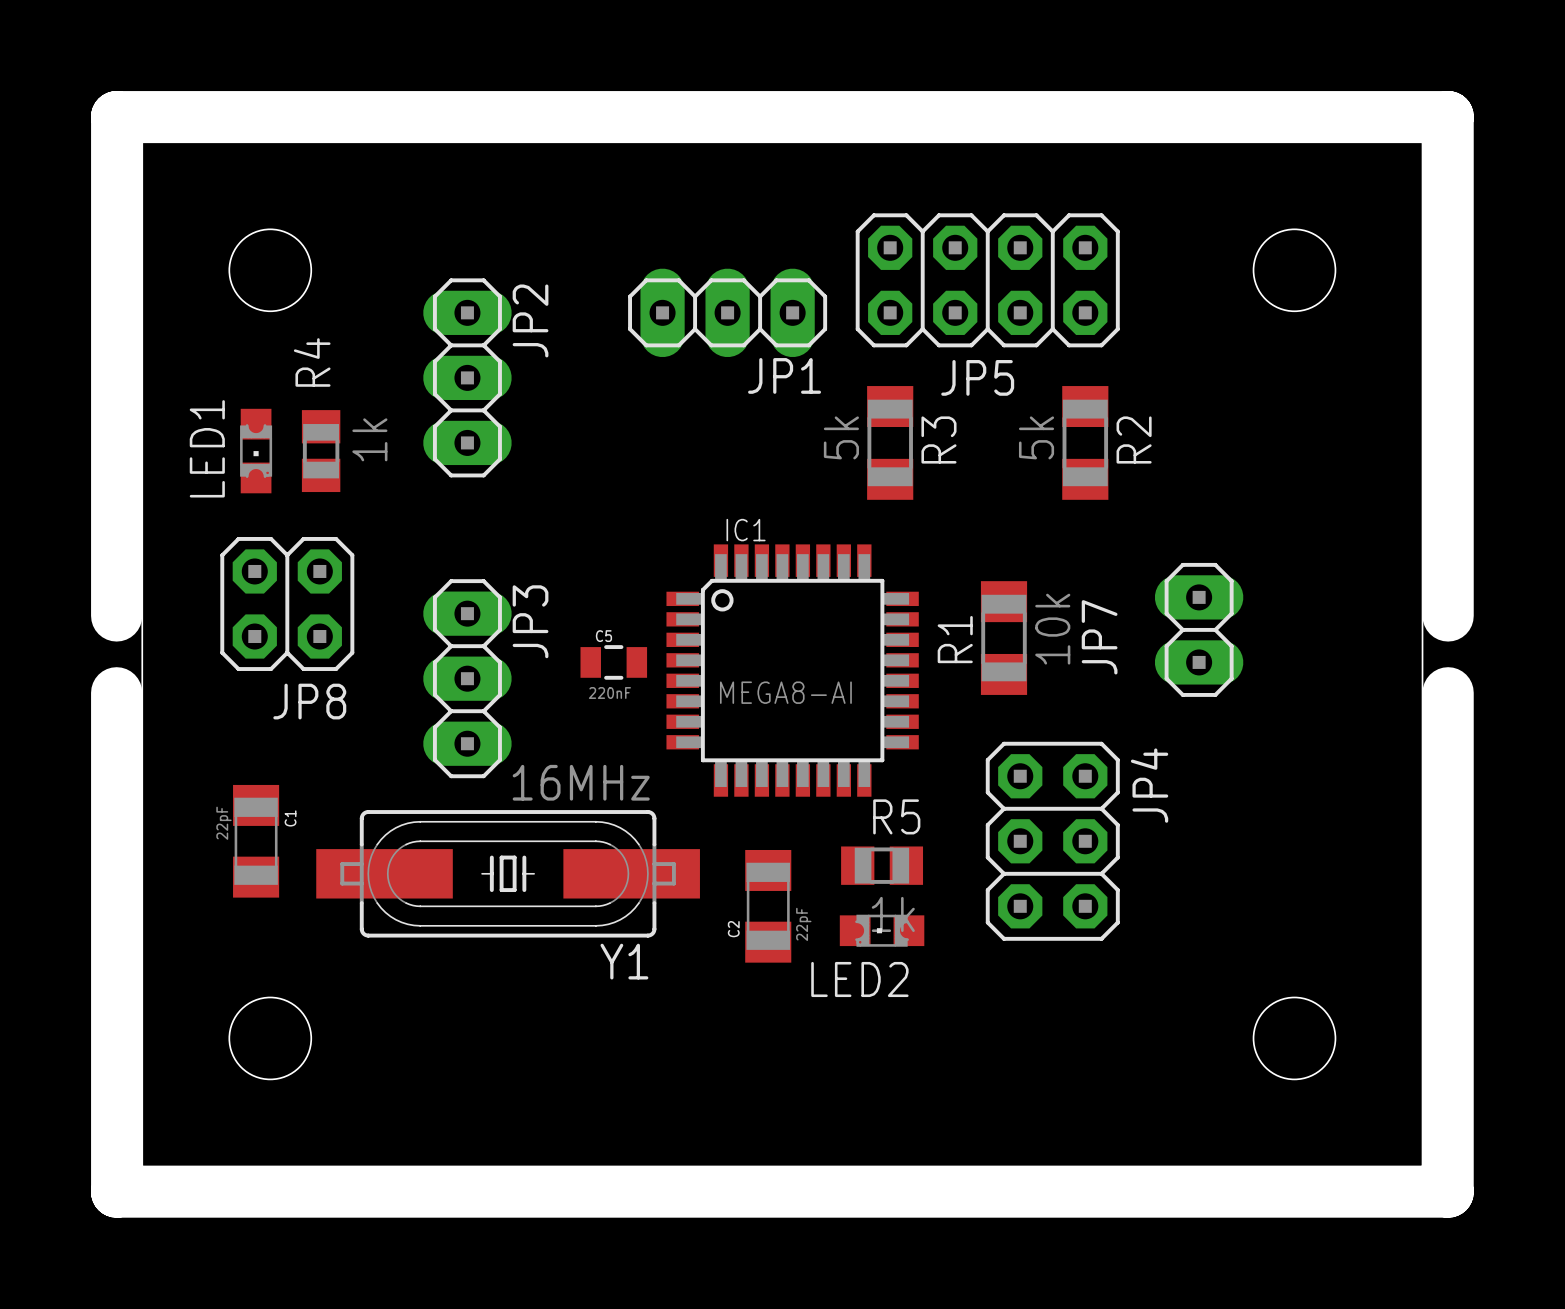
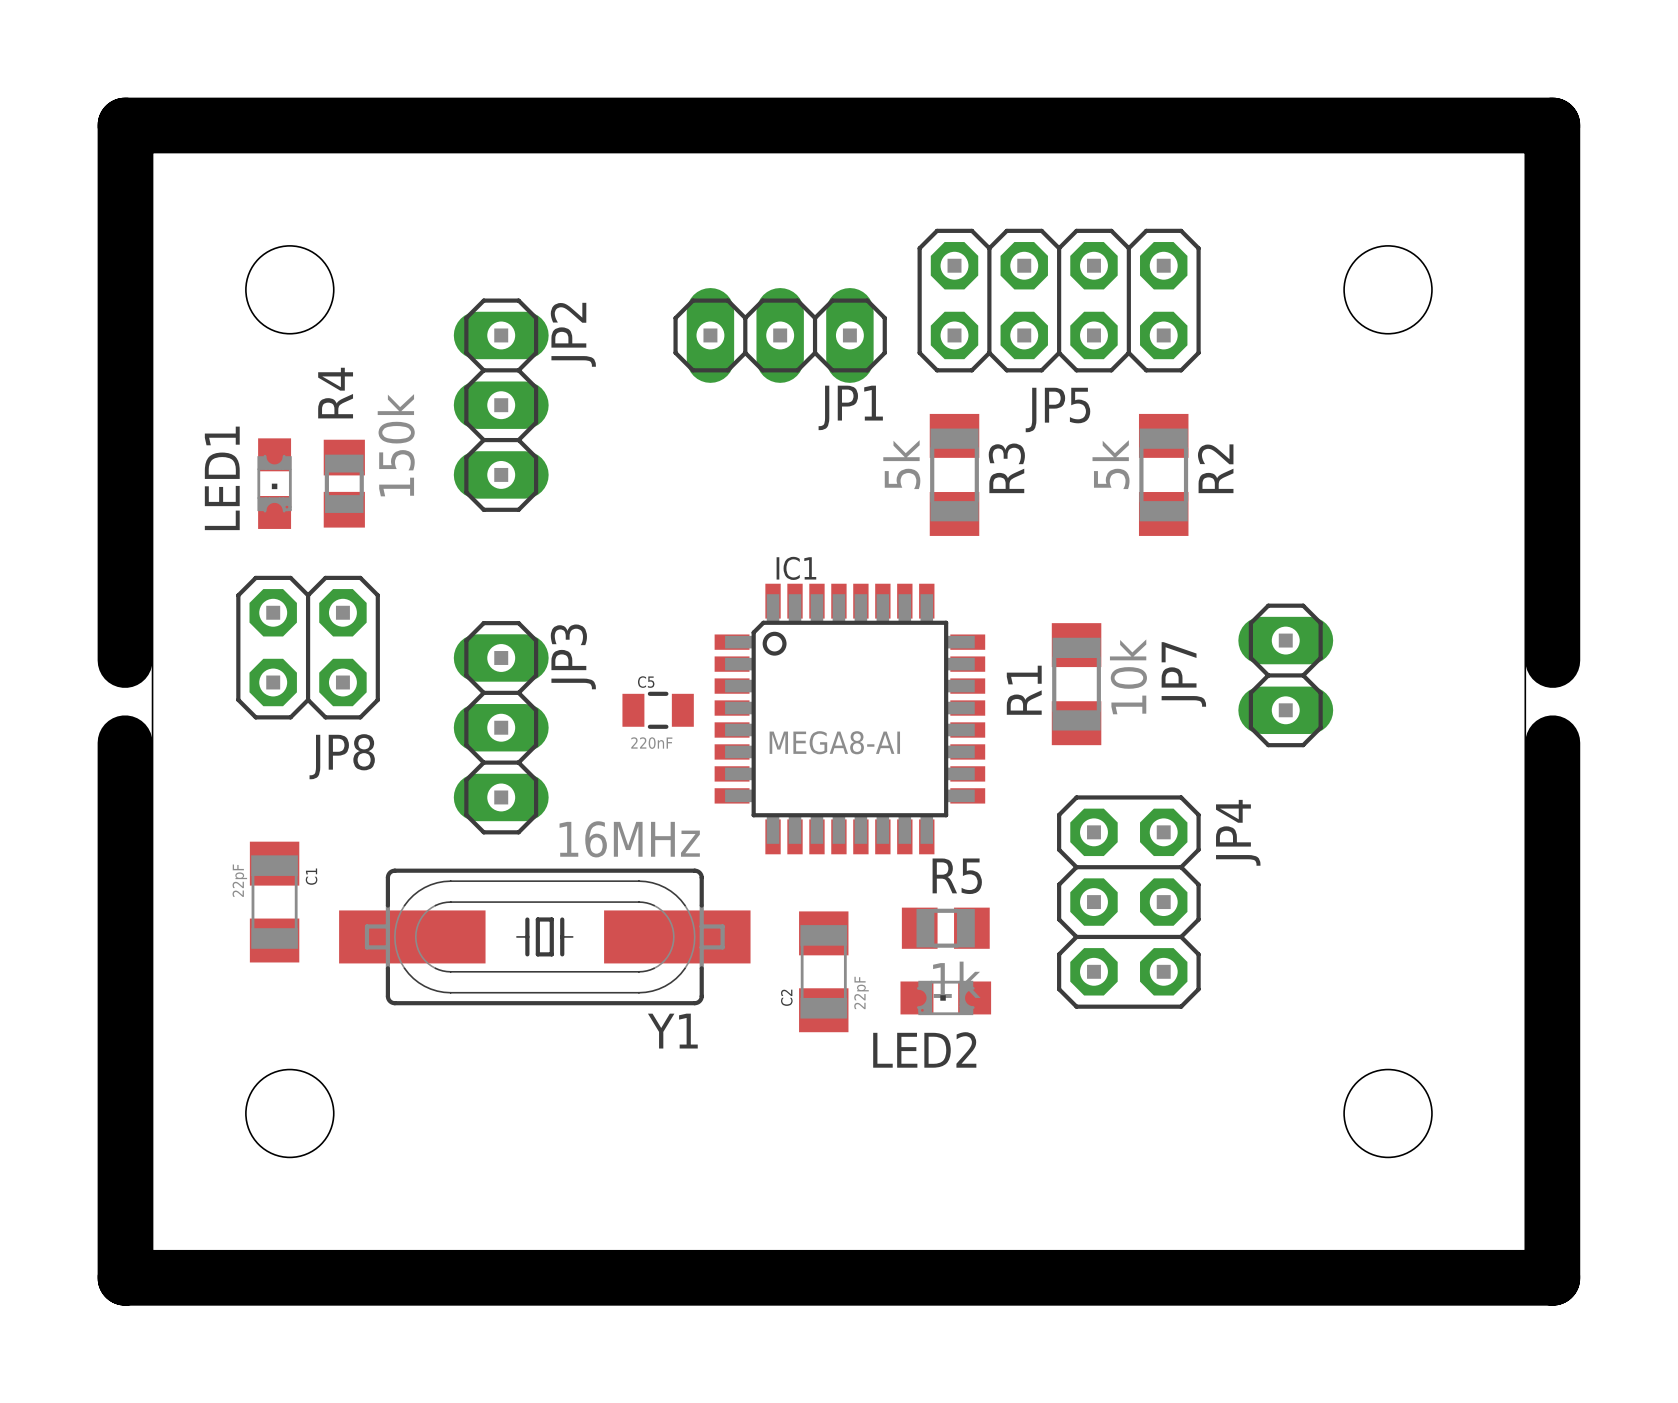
R4 value: 1k (369, 439) -> 150k (396, 445)

